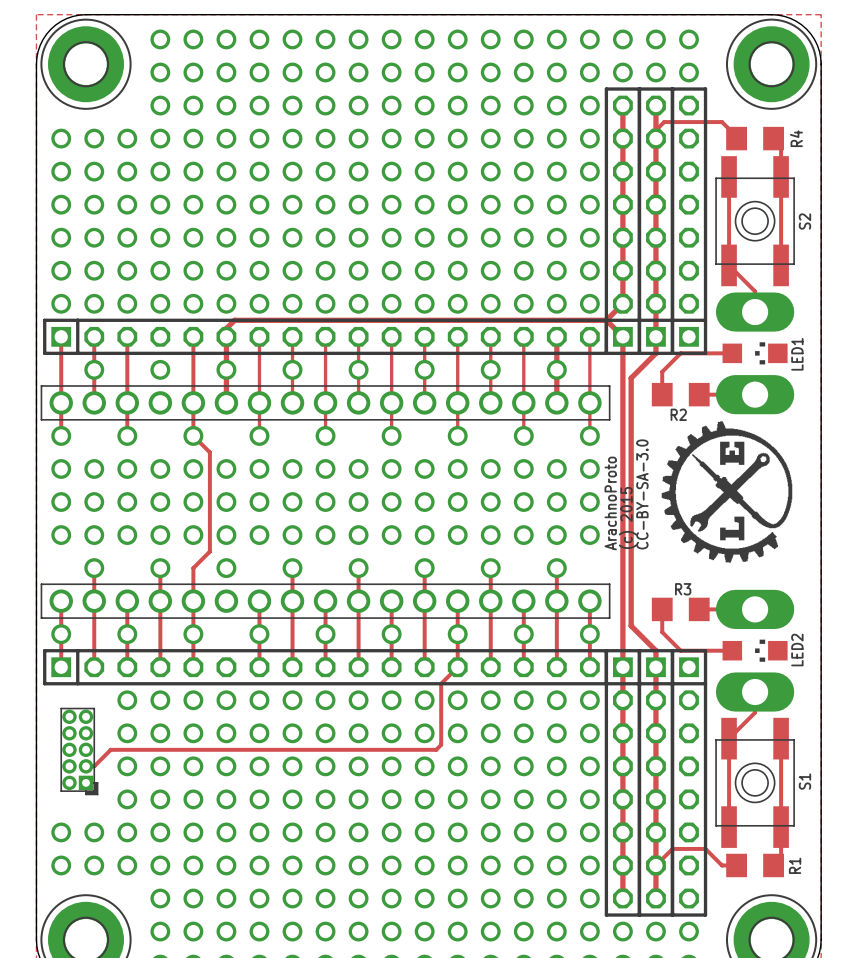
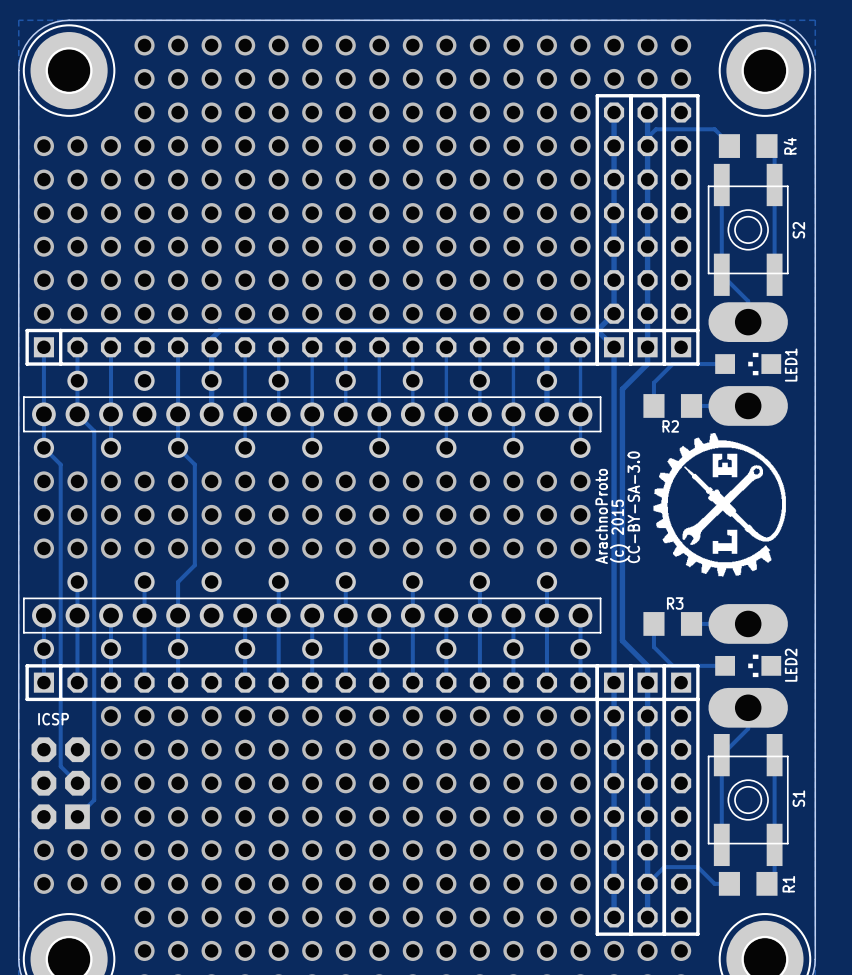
track: none -> (77, 414) (94, 431) (94, 800) (77, 816)
track: none -> (43, 447) (60, 464) (60, 766) (77, 783)
track: (457, 667) (441, 683) (441, 744) (436, 749) (110, 749) (94, 766) (86, 766) -> none
part: (79, 751) -> none
ICSP: none -> (60, 783)

